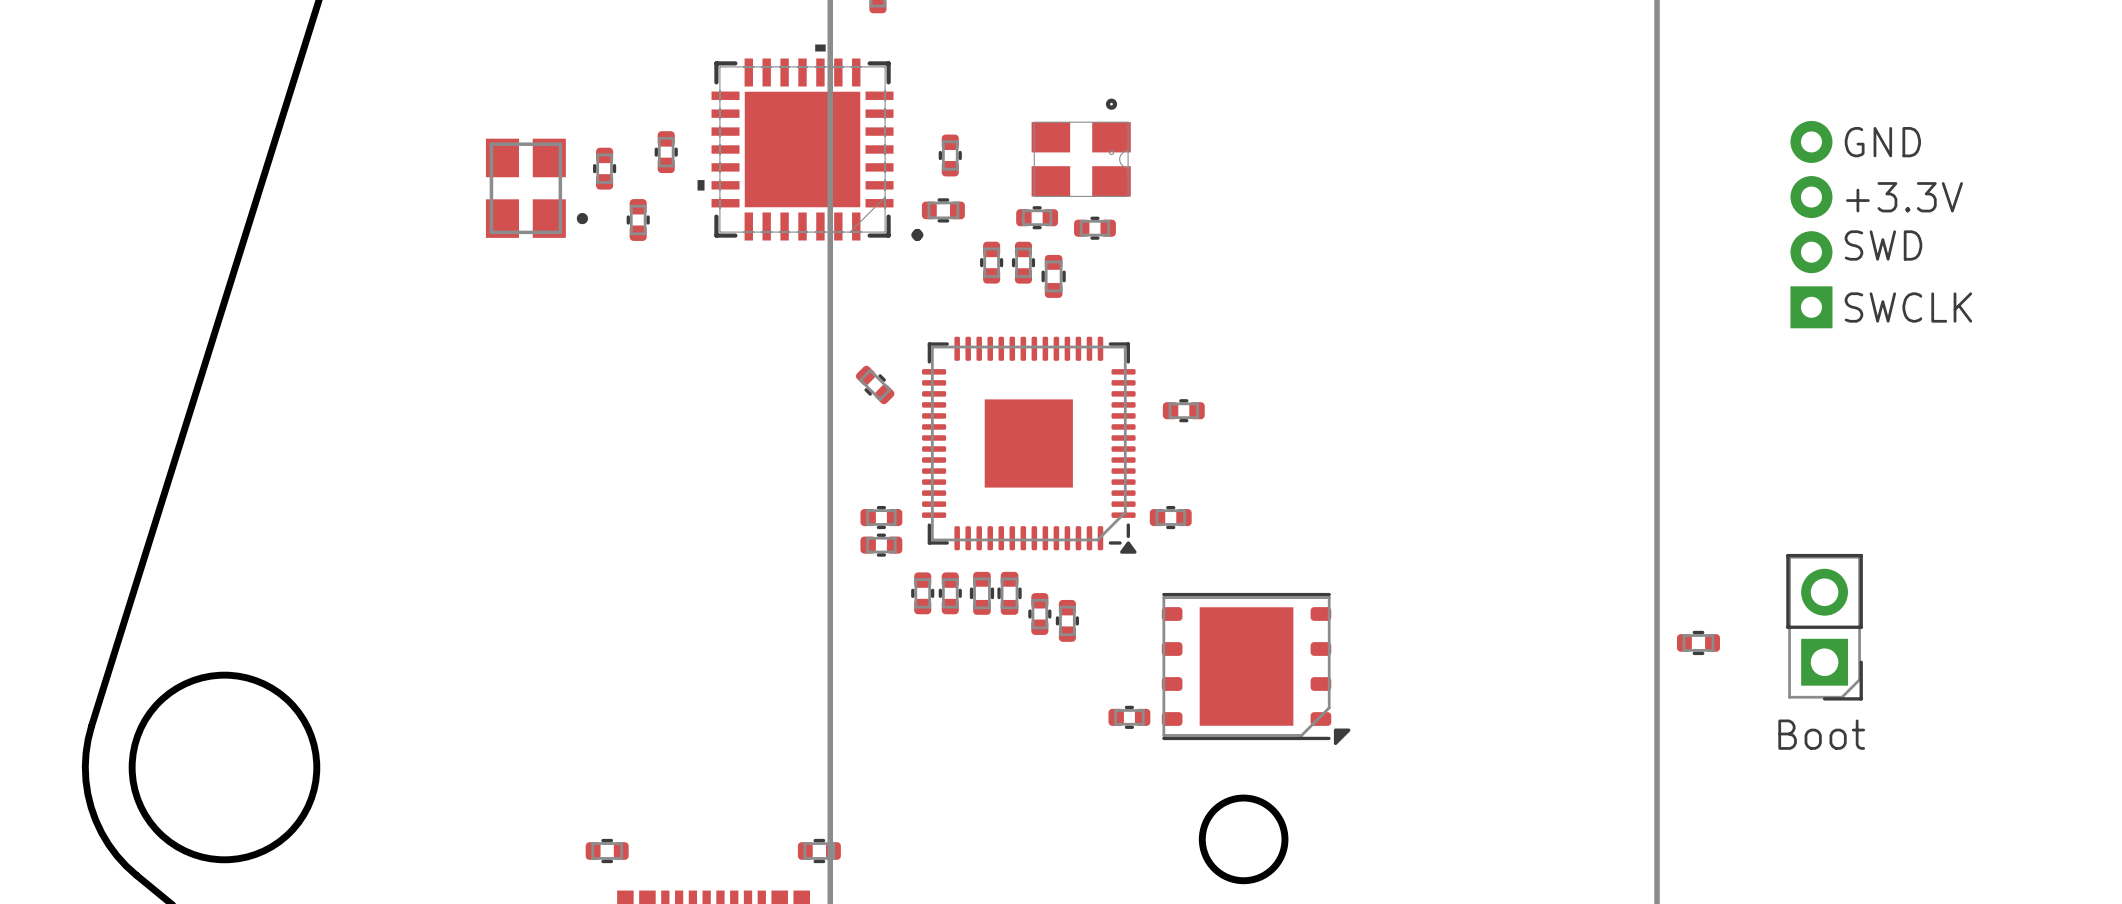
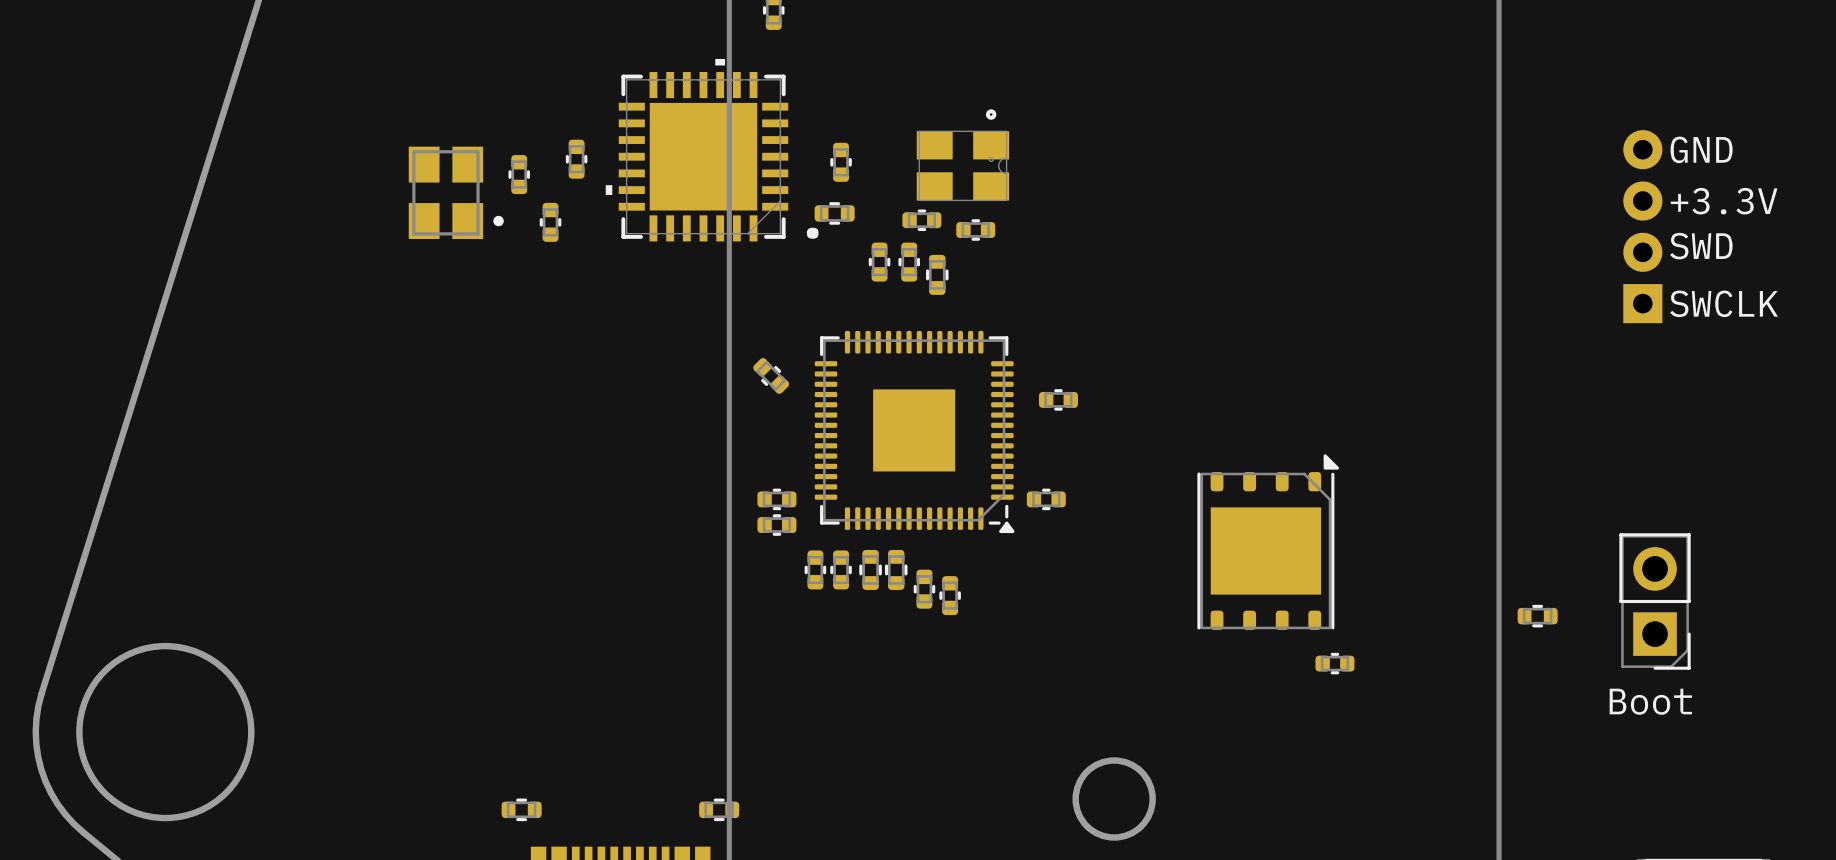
part rotation: 0° (1256, 668) -> 90° counterclockwise (1268, 542)
part position: (1256, 668) -> (1268, 542)
part position: (1129, 717) -> (1334, 663)

